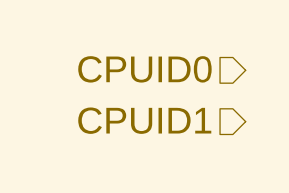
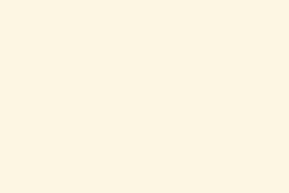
hierarchical label: CPUID0 (144, 69) -> none
hierarchical label: CPUID1 (144, 120) -> none

